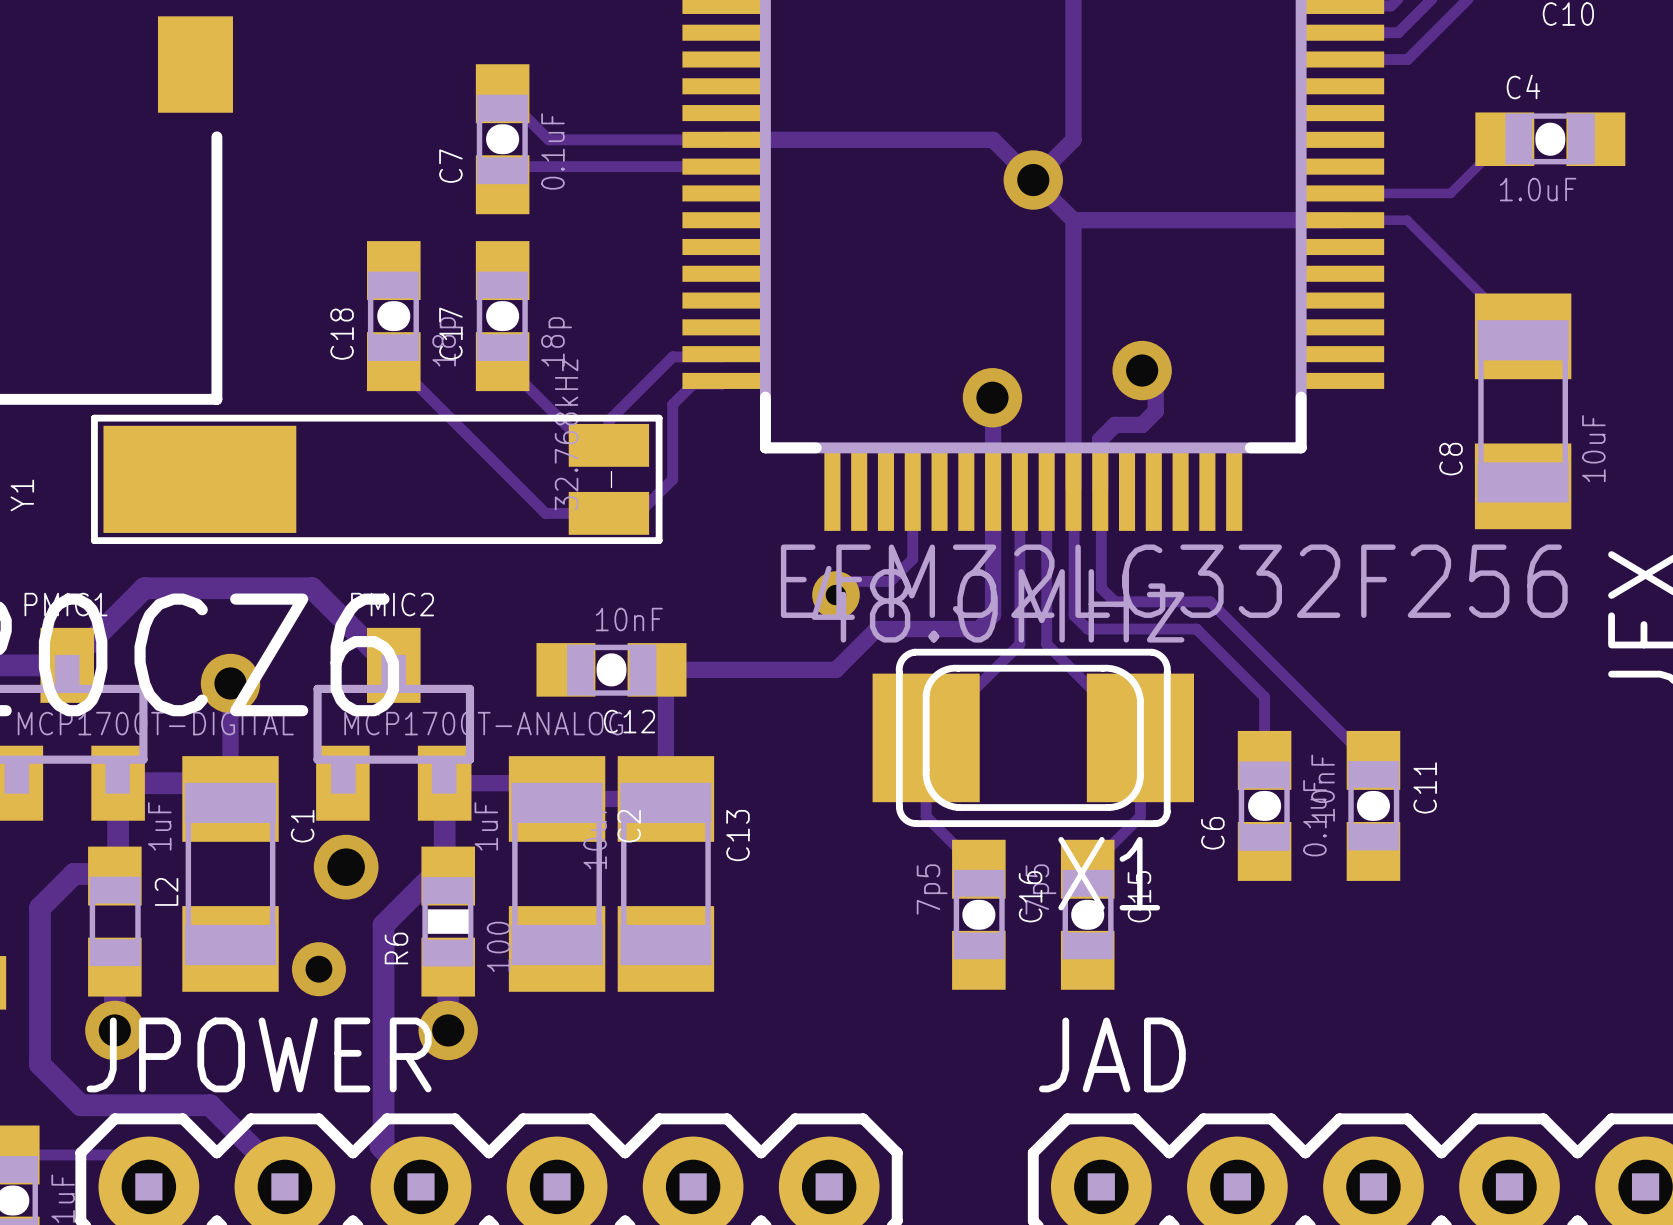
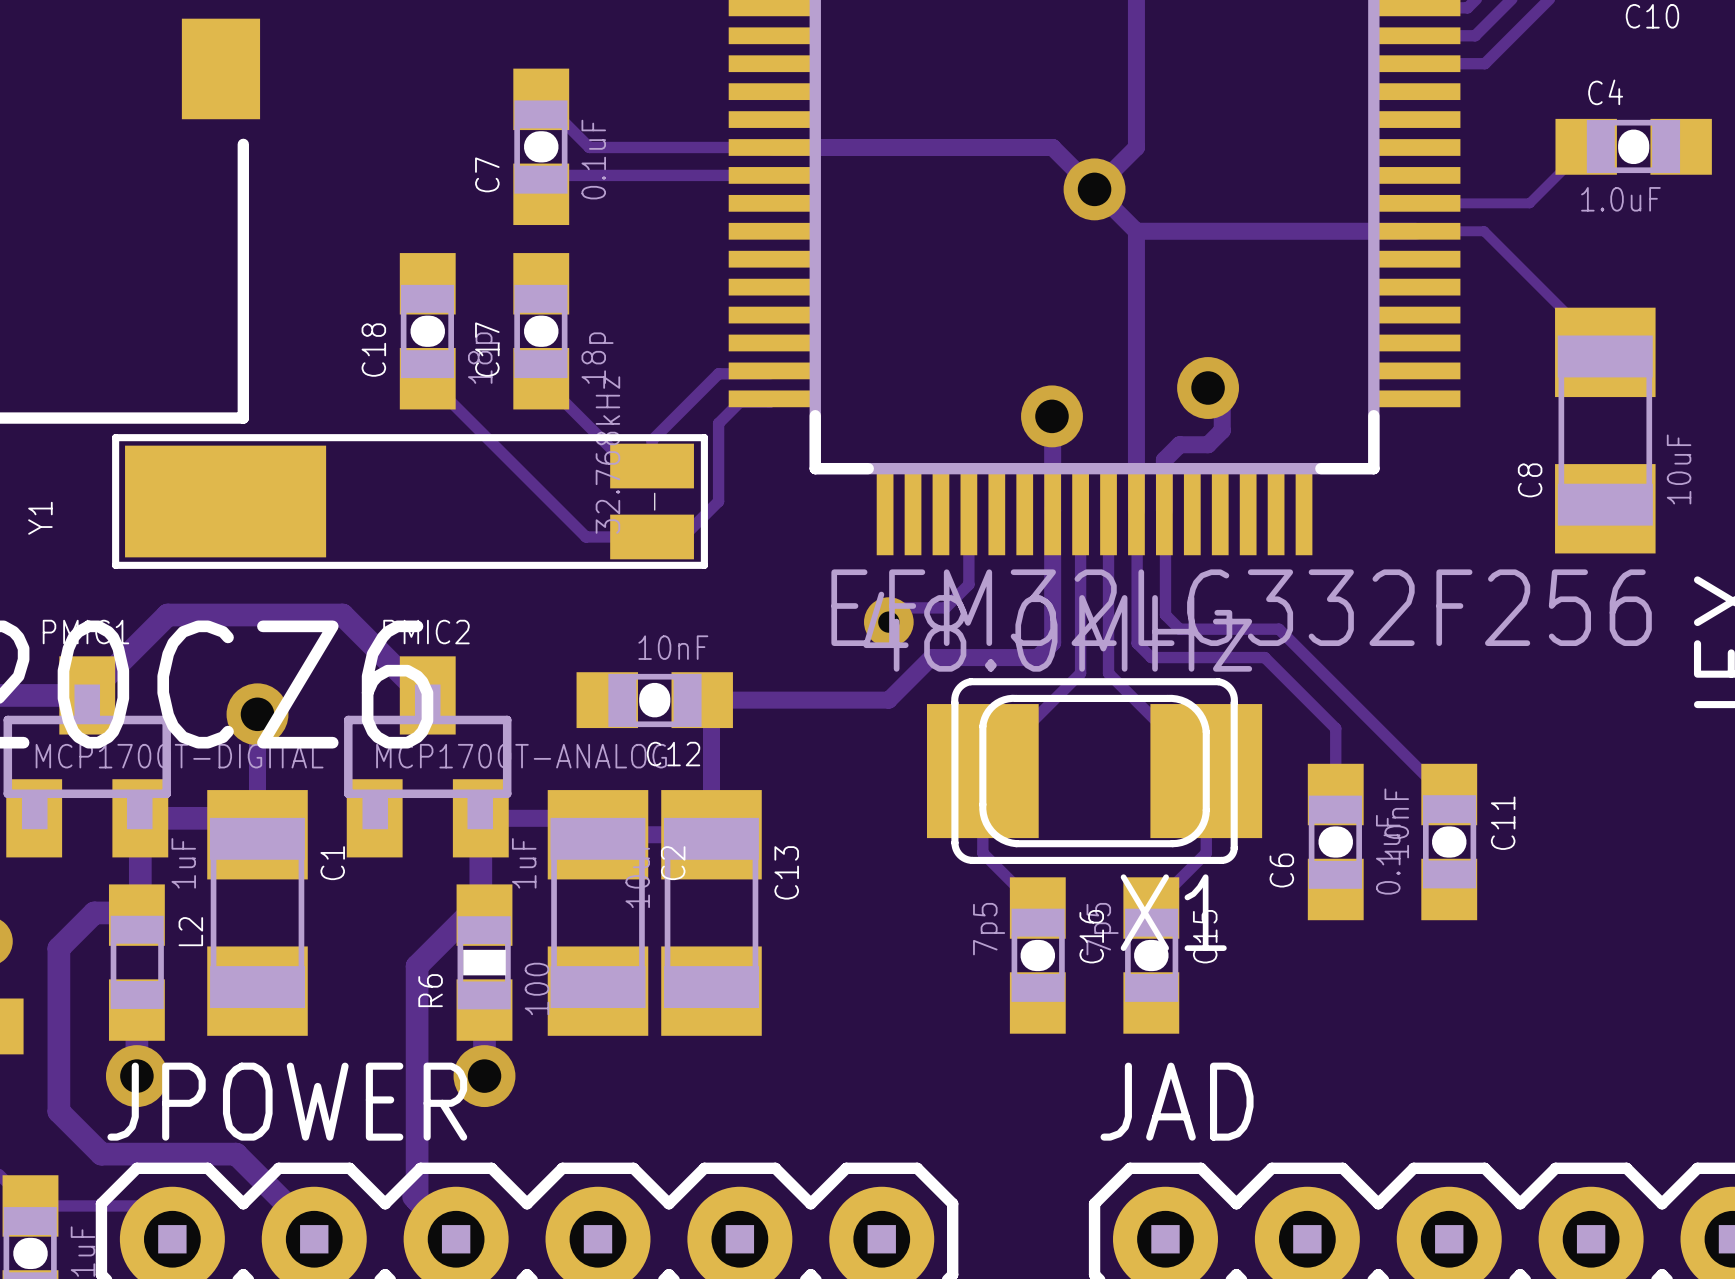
via: (346, 867) -> none
via: (318, 969) -> none

